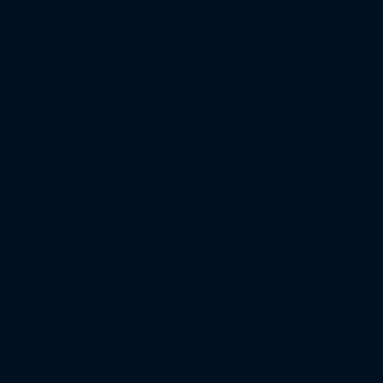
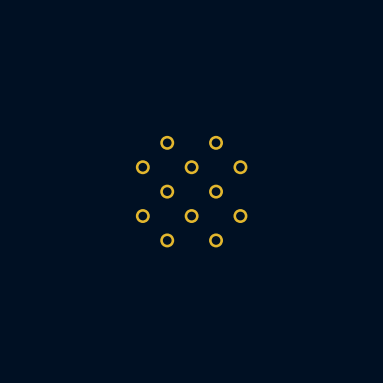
part: none -> (191, 191)

